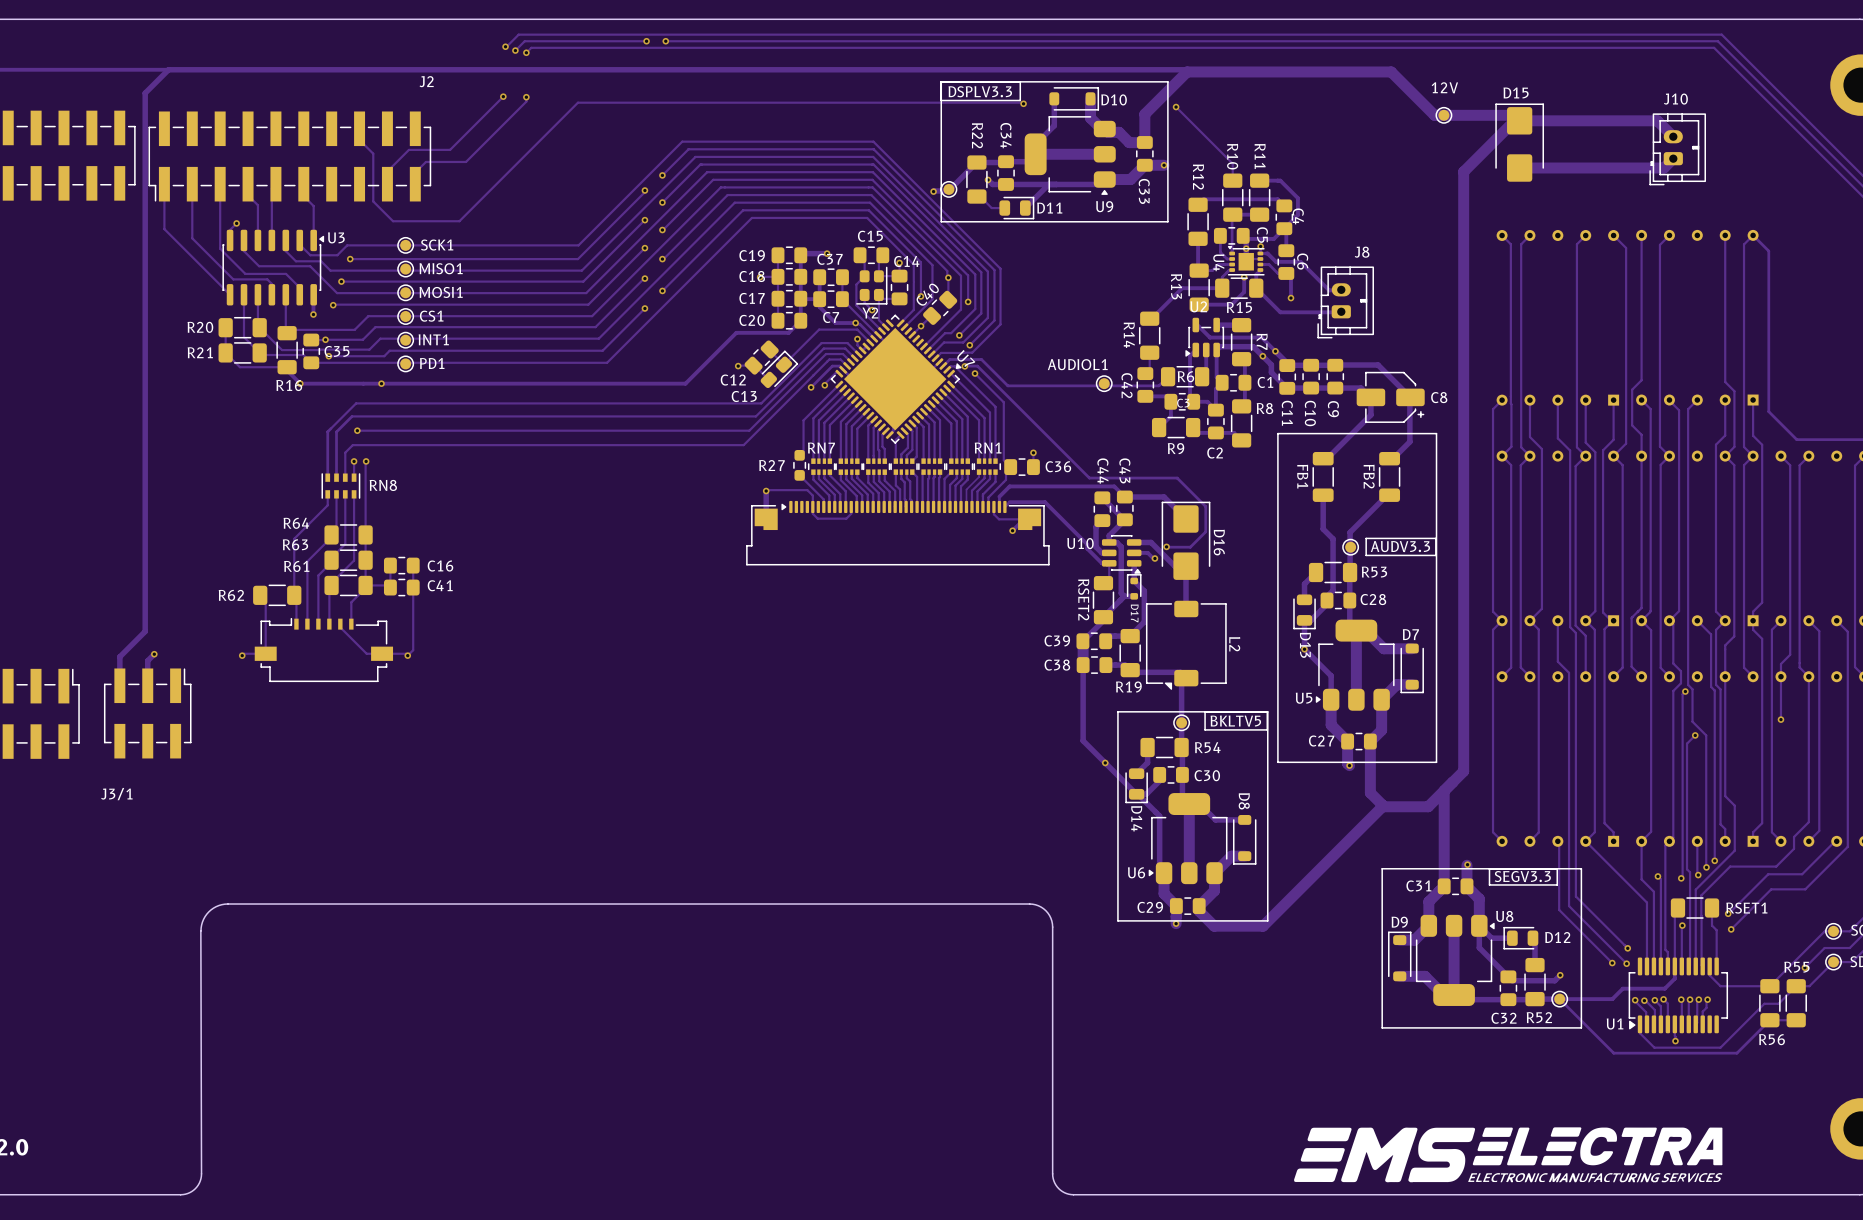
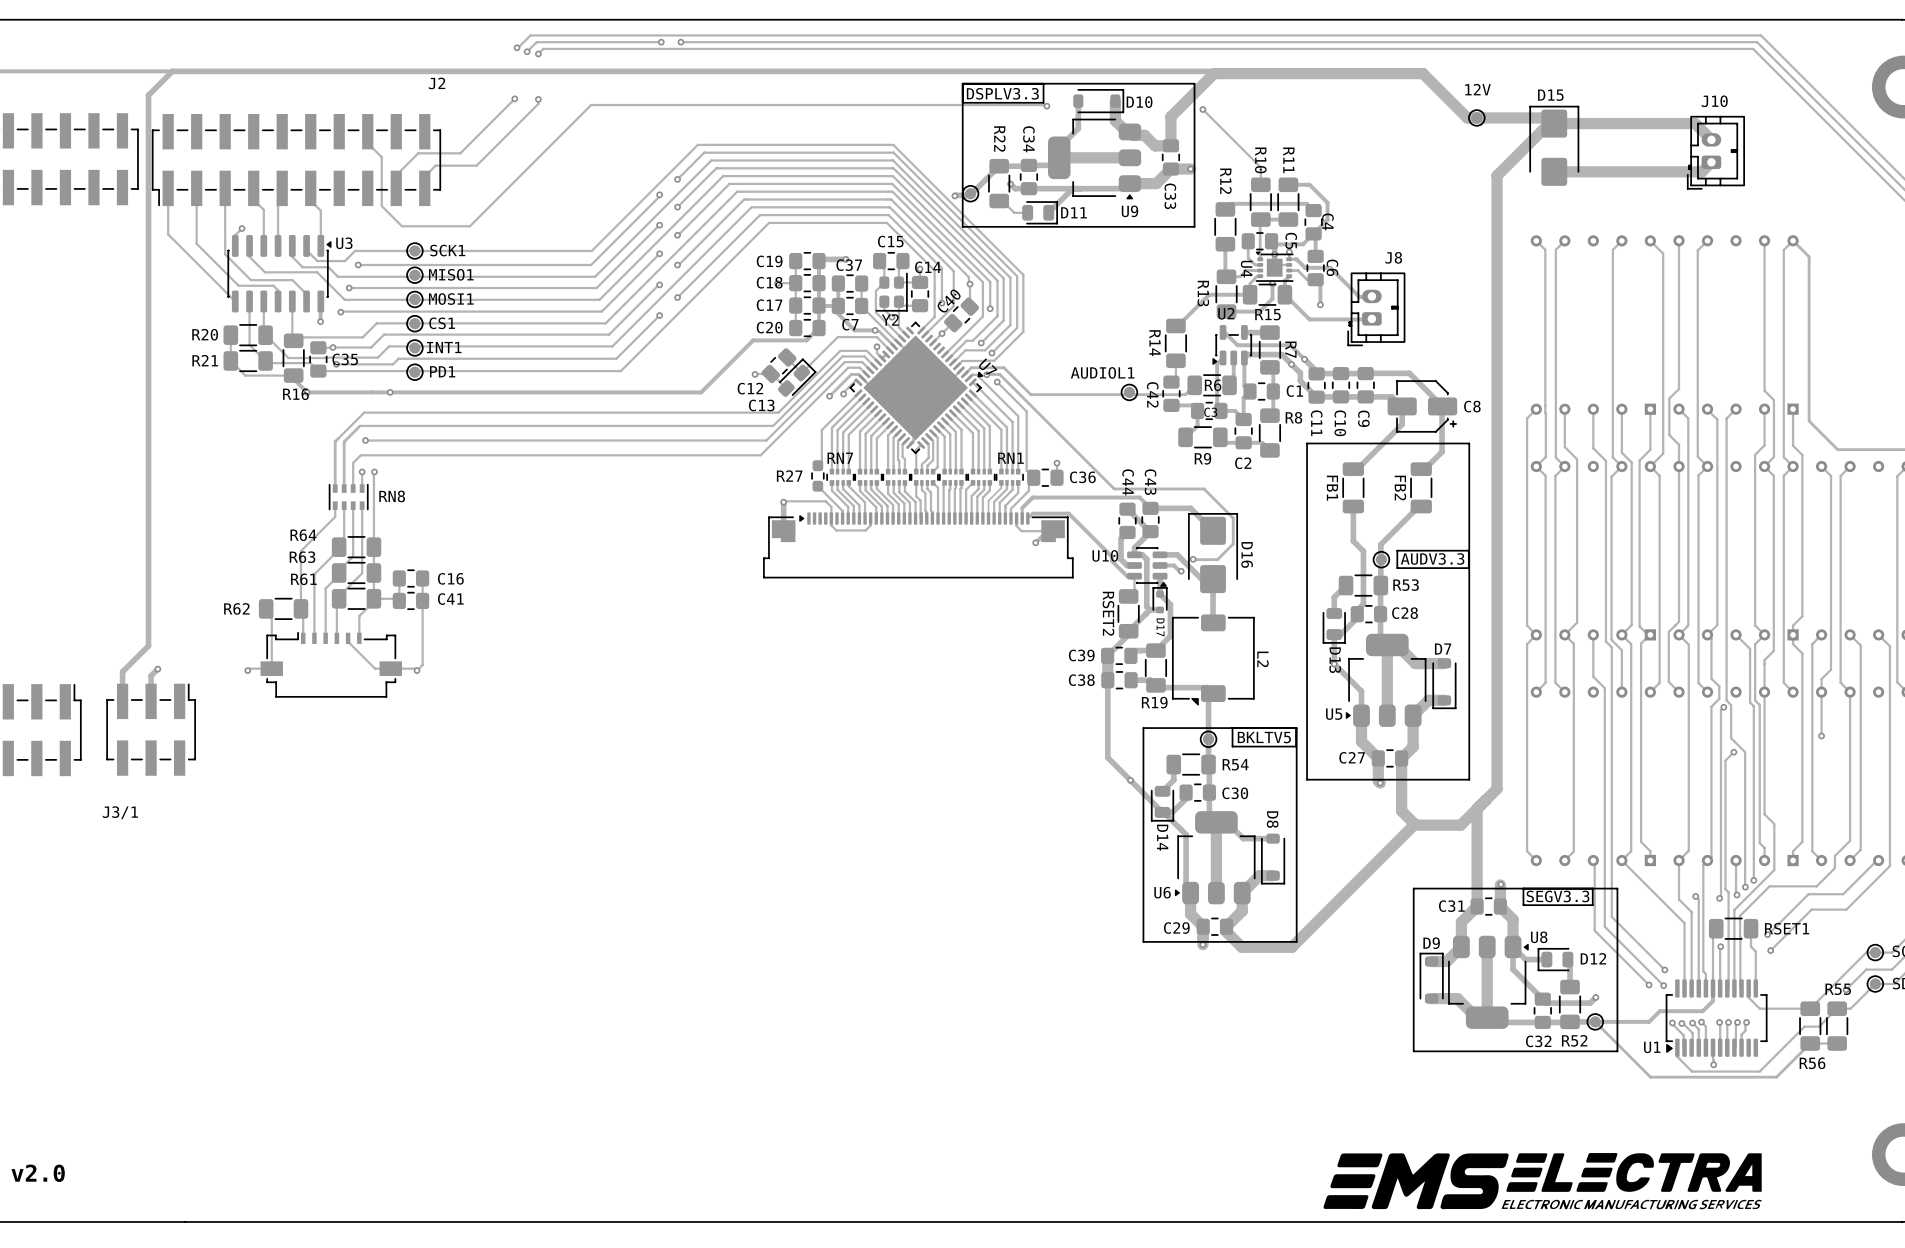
board edge: (200, 930) (202, 922) (208, 911) (216, 906) (227, 904) (1035, 904) (1047, 913) (1052, 927) (1052, 1176) (1058, 1188) (1064, 1192) (1073, 1194) -> (184, 1221) (1097, 1221)
board edge: (200, 930) (201, 1176) (195, 1188) (189, 1192) (180, 1194) -> none

